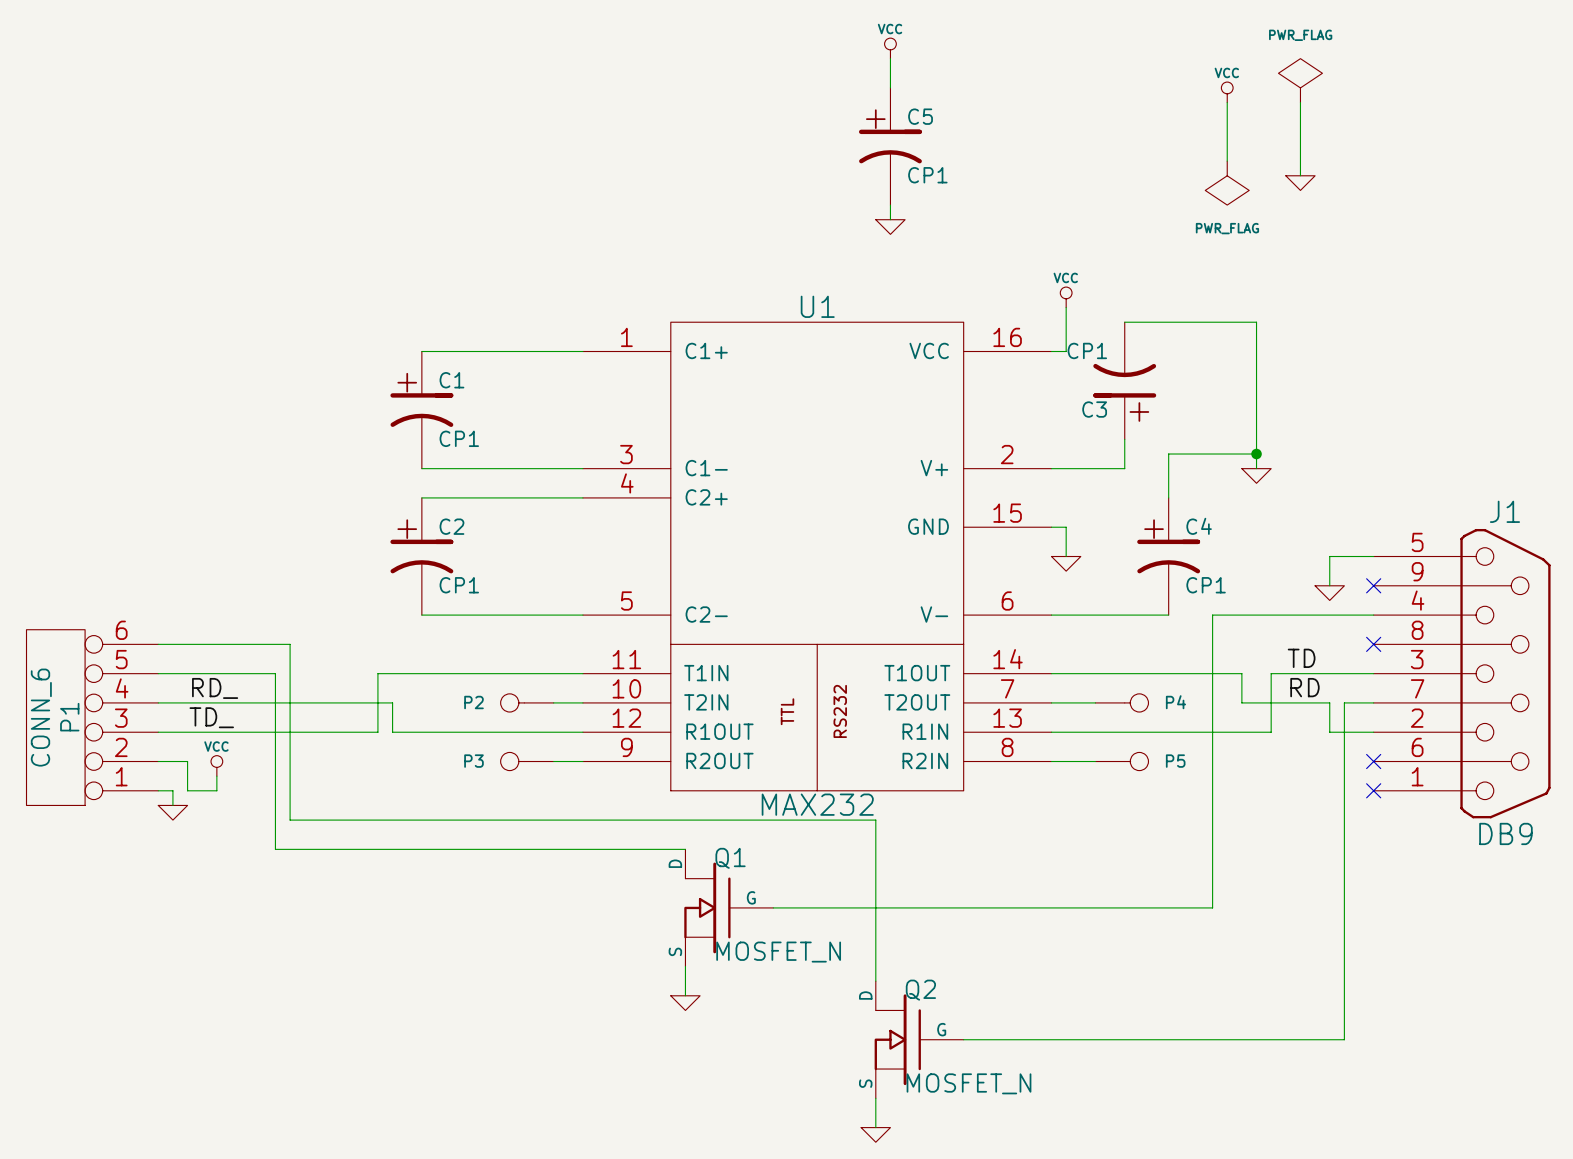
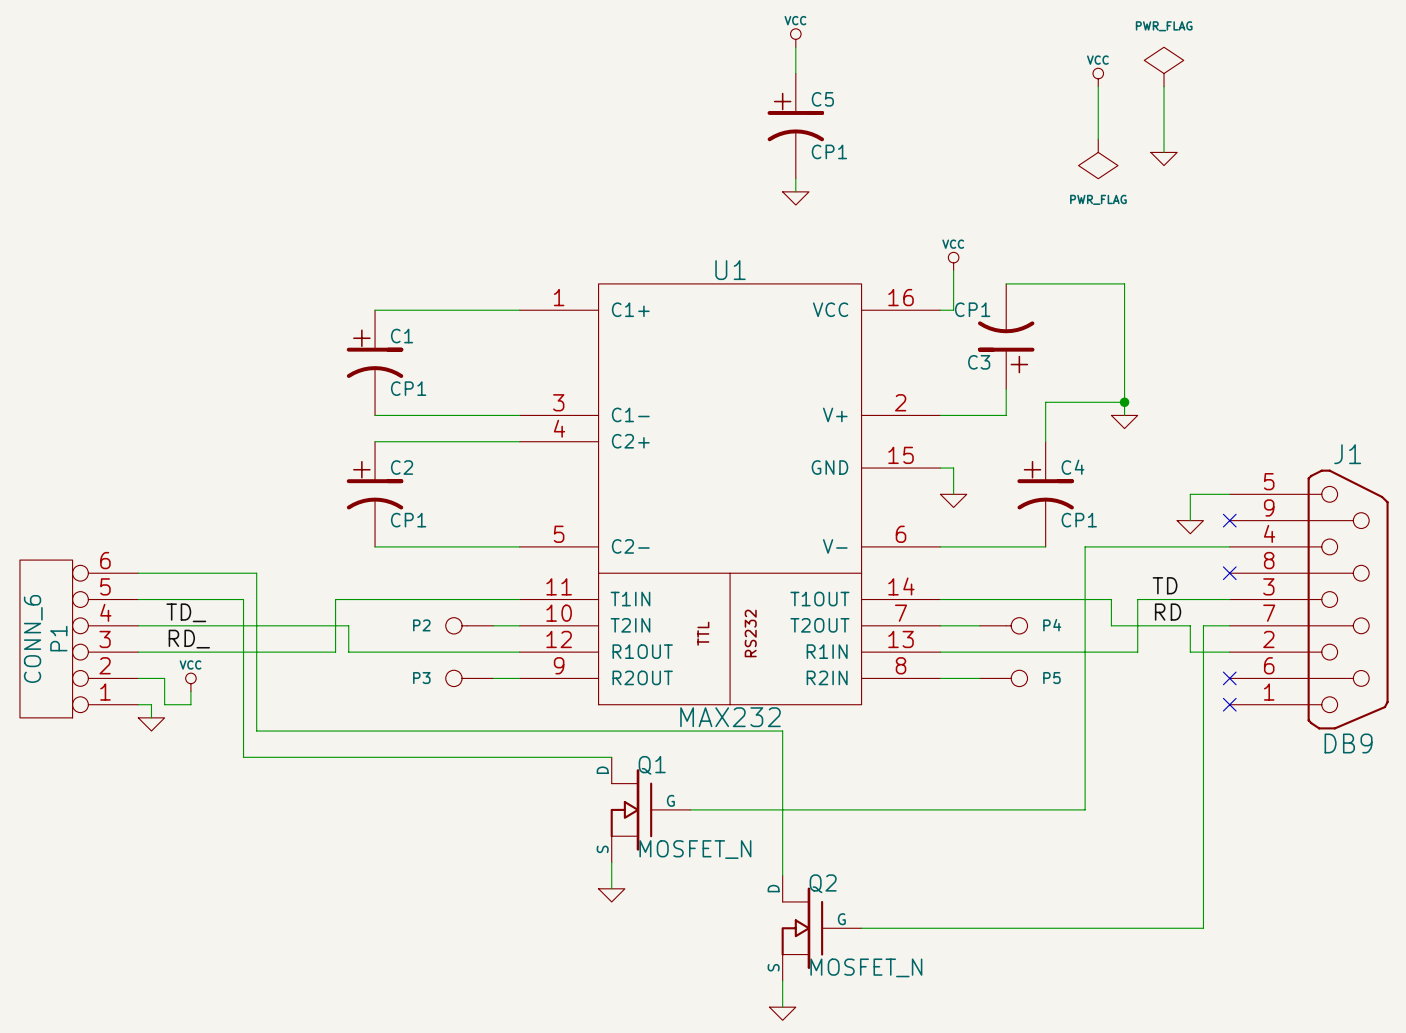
label: RD_ (215, 688) -> TD_ (186, 612)
label: TD_ (211, 717) -> RD_ (189, 639)

